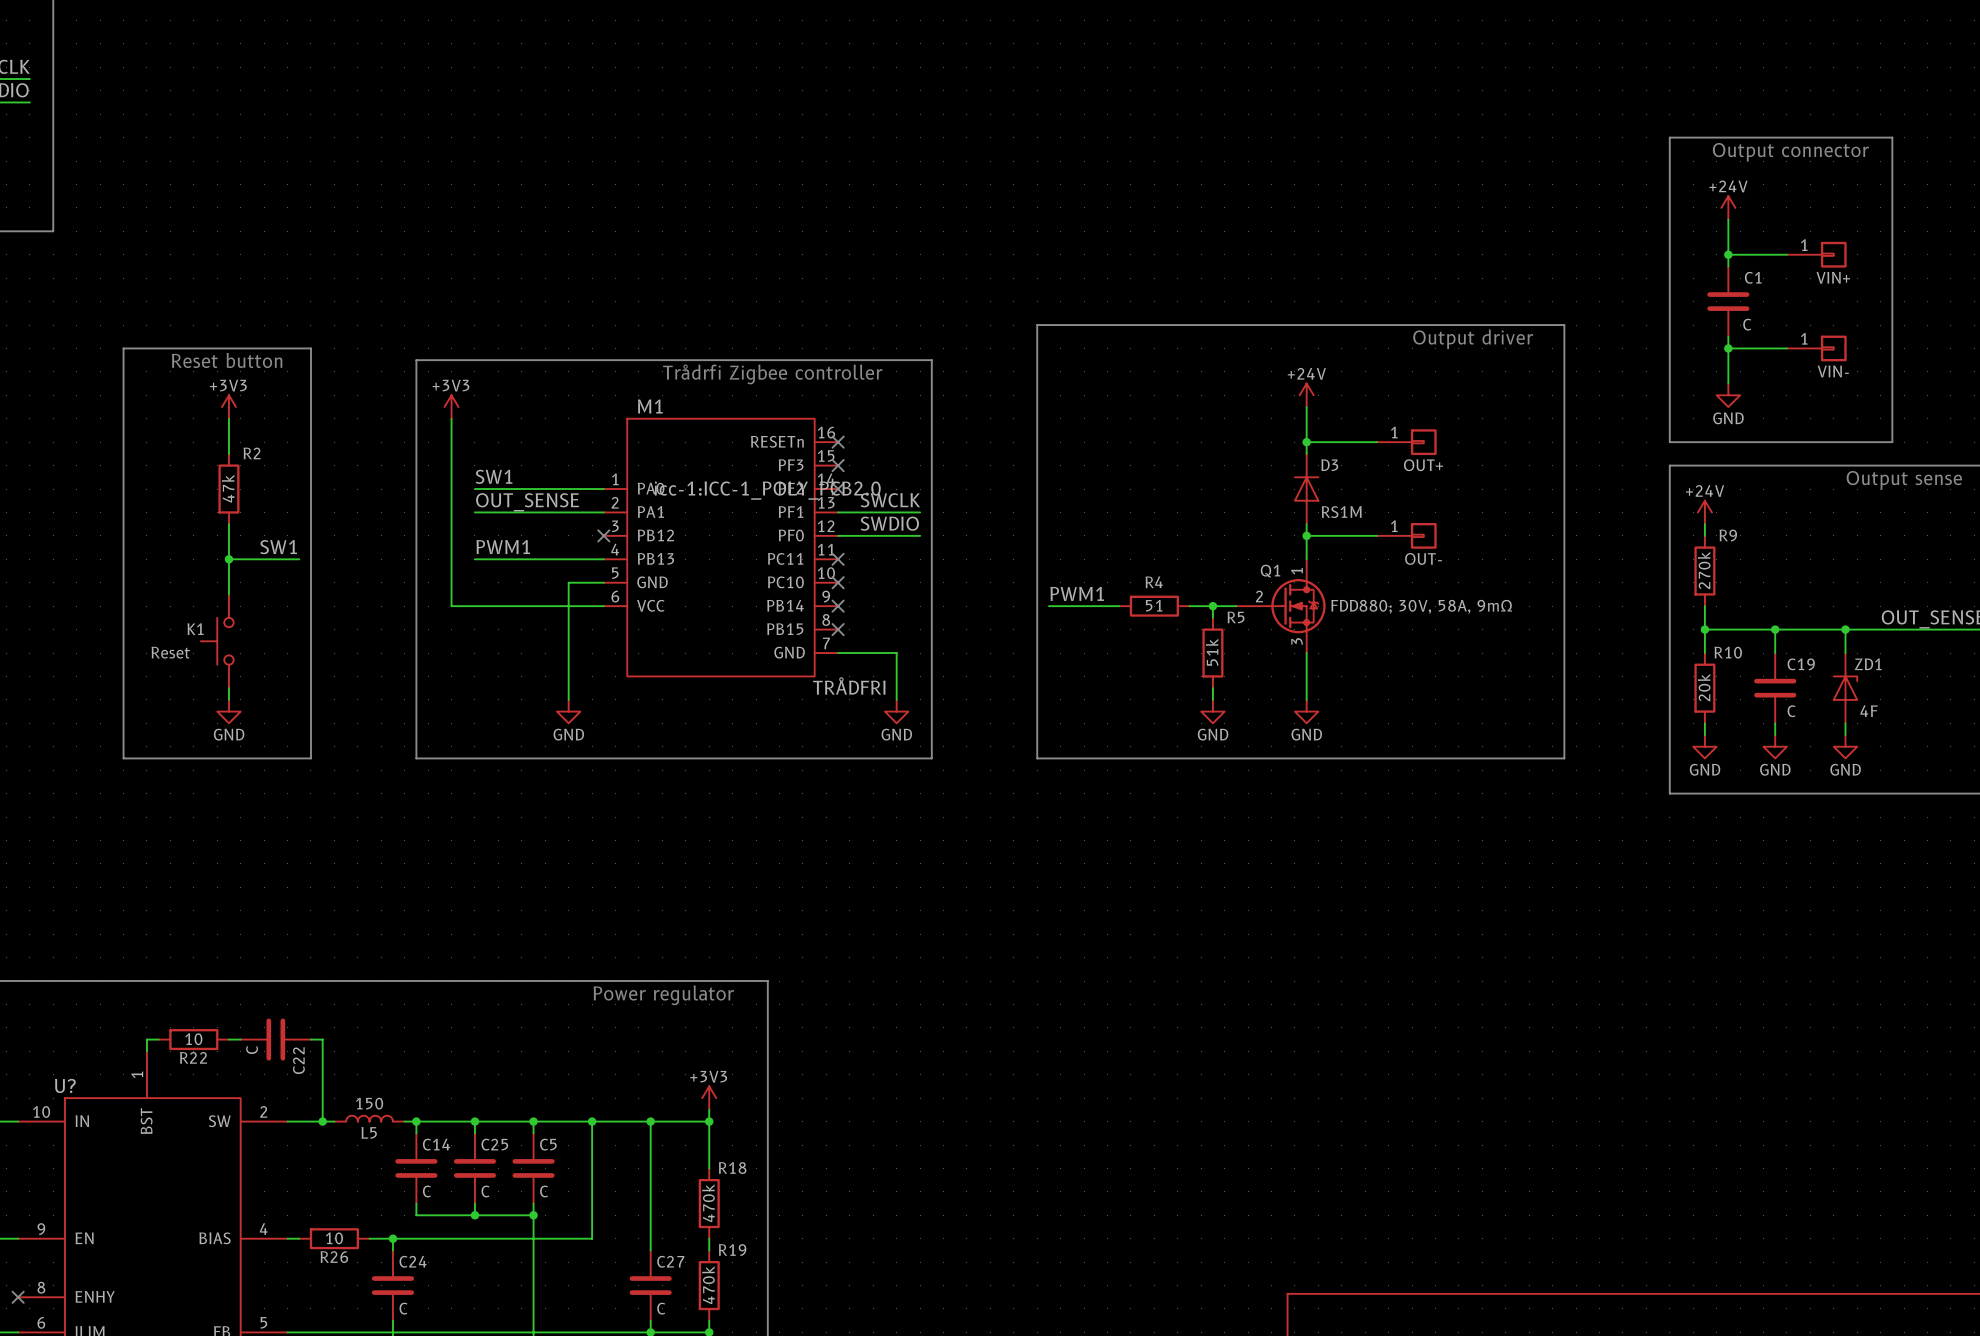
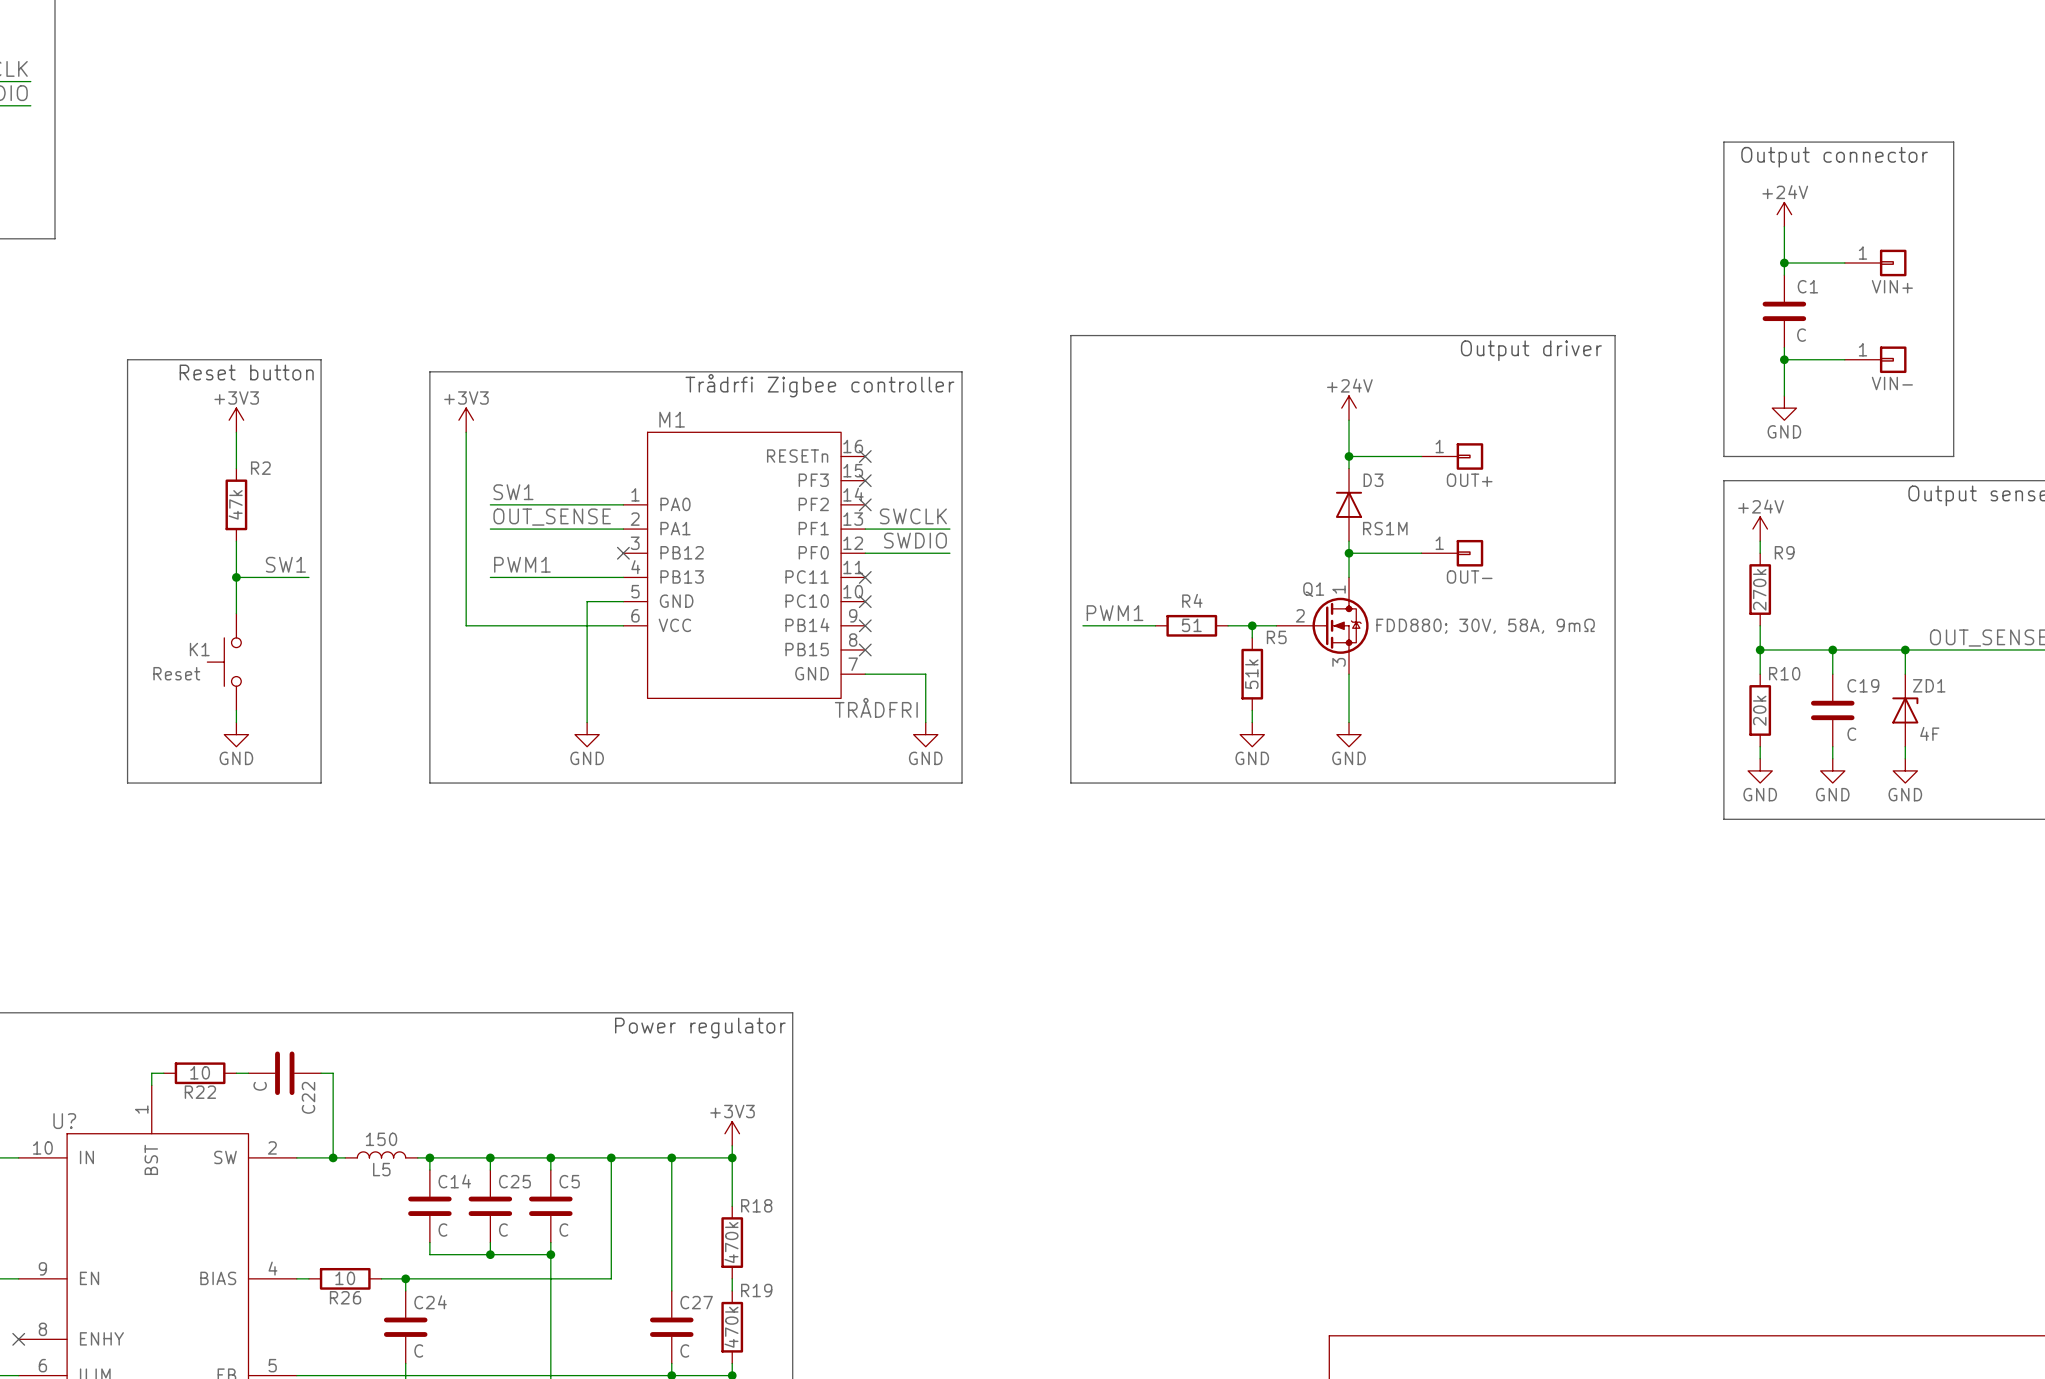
M1 text: icc-1:ICC-1_POLY_PCB2.0 (767, 490) -> none

